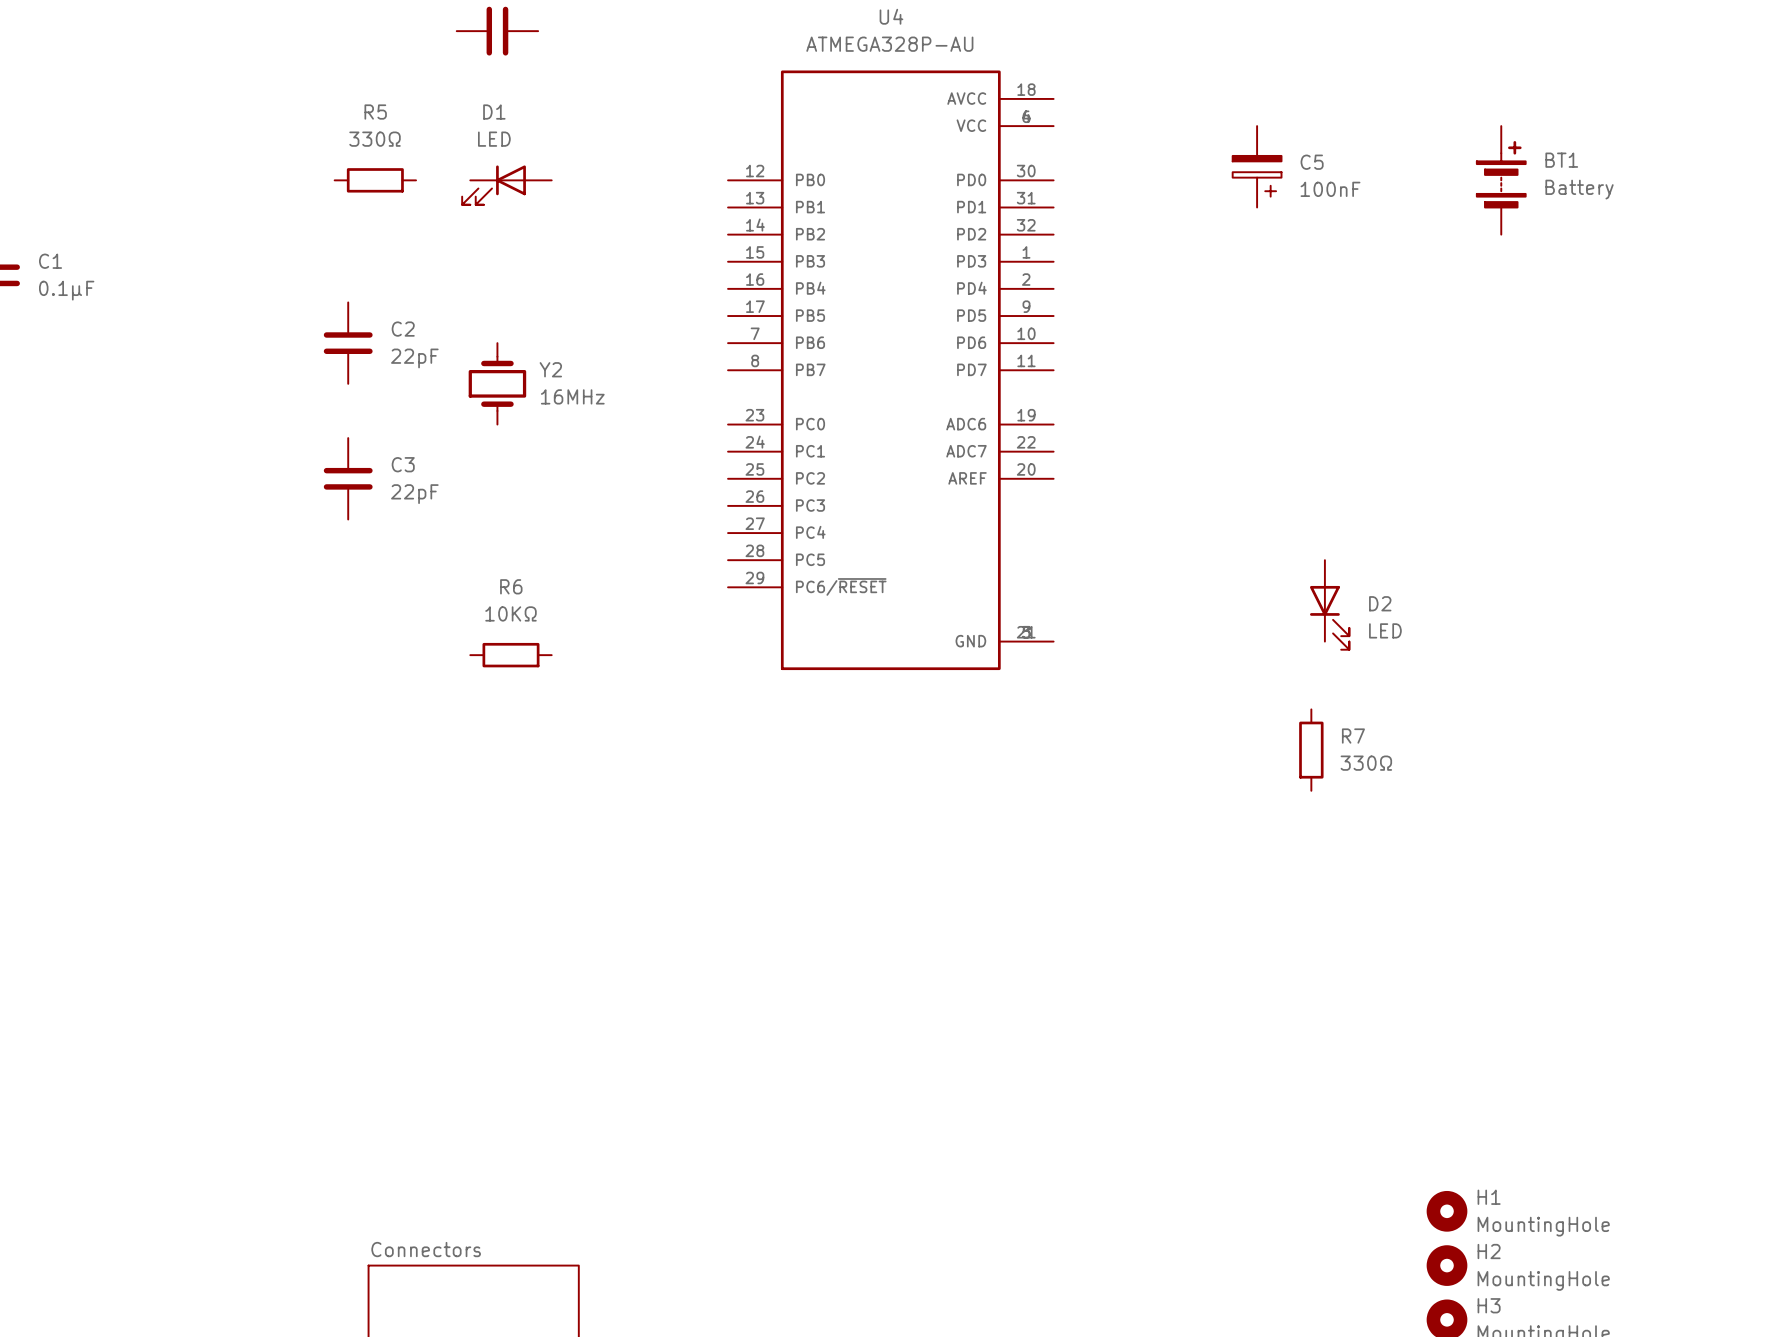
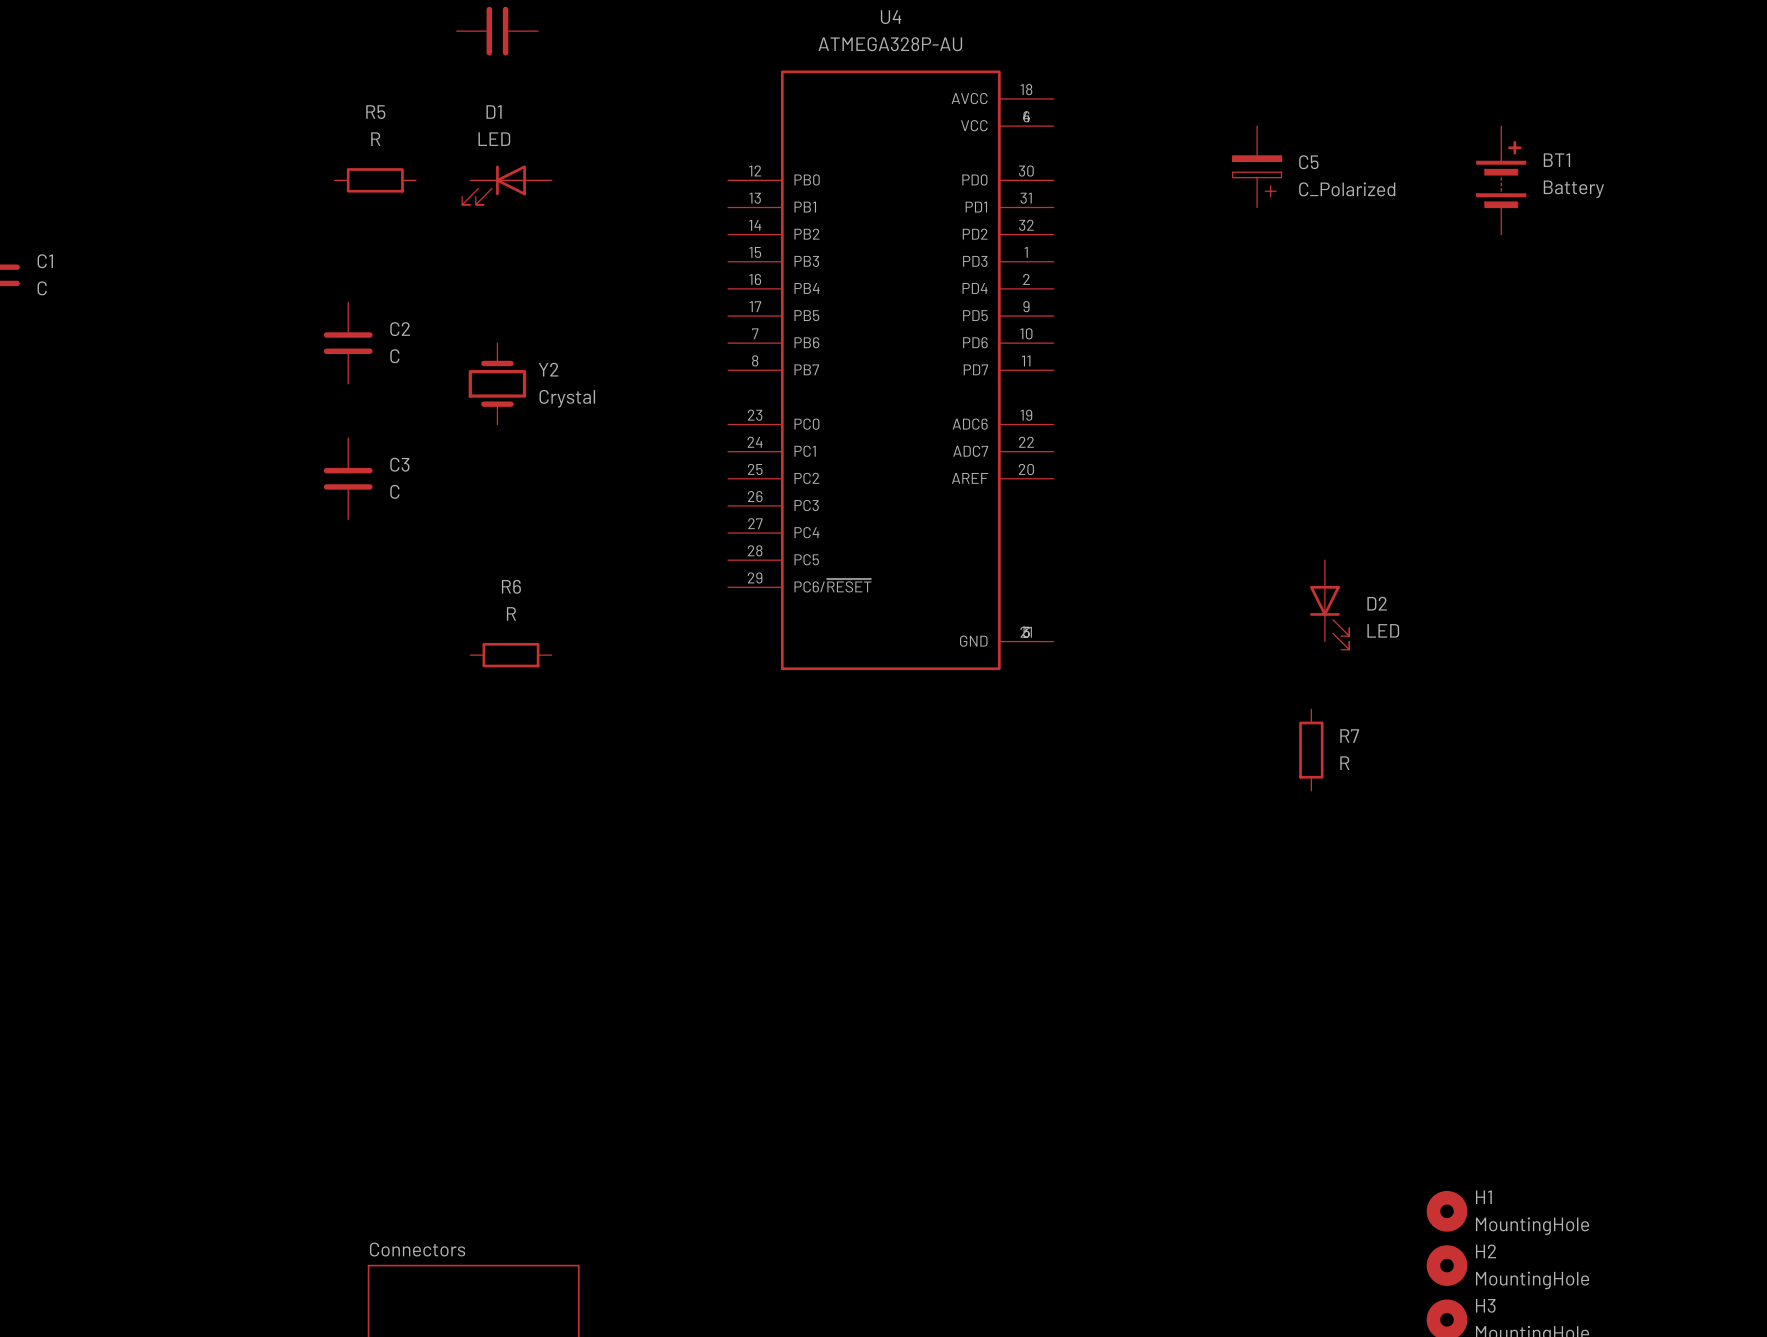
R5 value: 330Ω (375, 139) -> R (375, 139)
C5 value: 100nF (1330, 189) -> C_Polarized (1347, 189)
C1 value: 0.1μF (66, 290) -> C (42, 288)
C2 value: 22pF (414, 358) -> C (394, 356)
Y2 value: 16MHz (572, 396) -> Crystal (567, 398)
C3 value: 22pF (414, 494) -> C (394, 491)
R6 value: 10KΩ (510, 613) -> R (511, 613)
R7 value: 330Ω (1366, 763) -> R (1344, 763)

